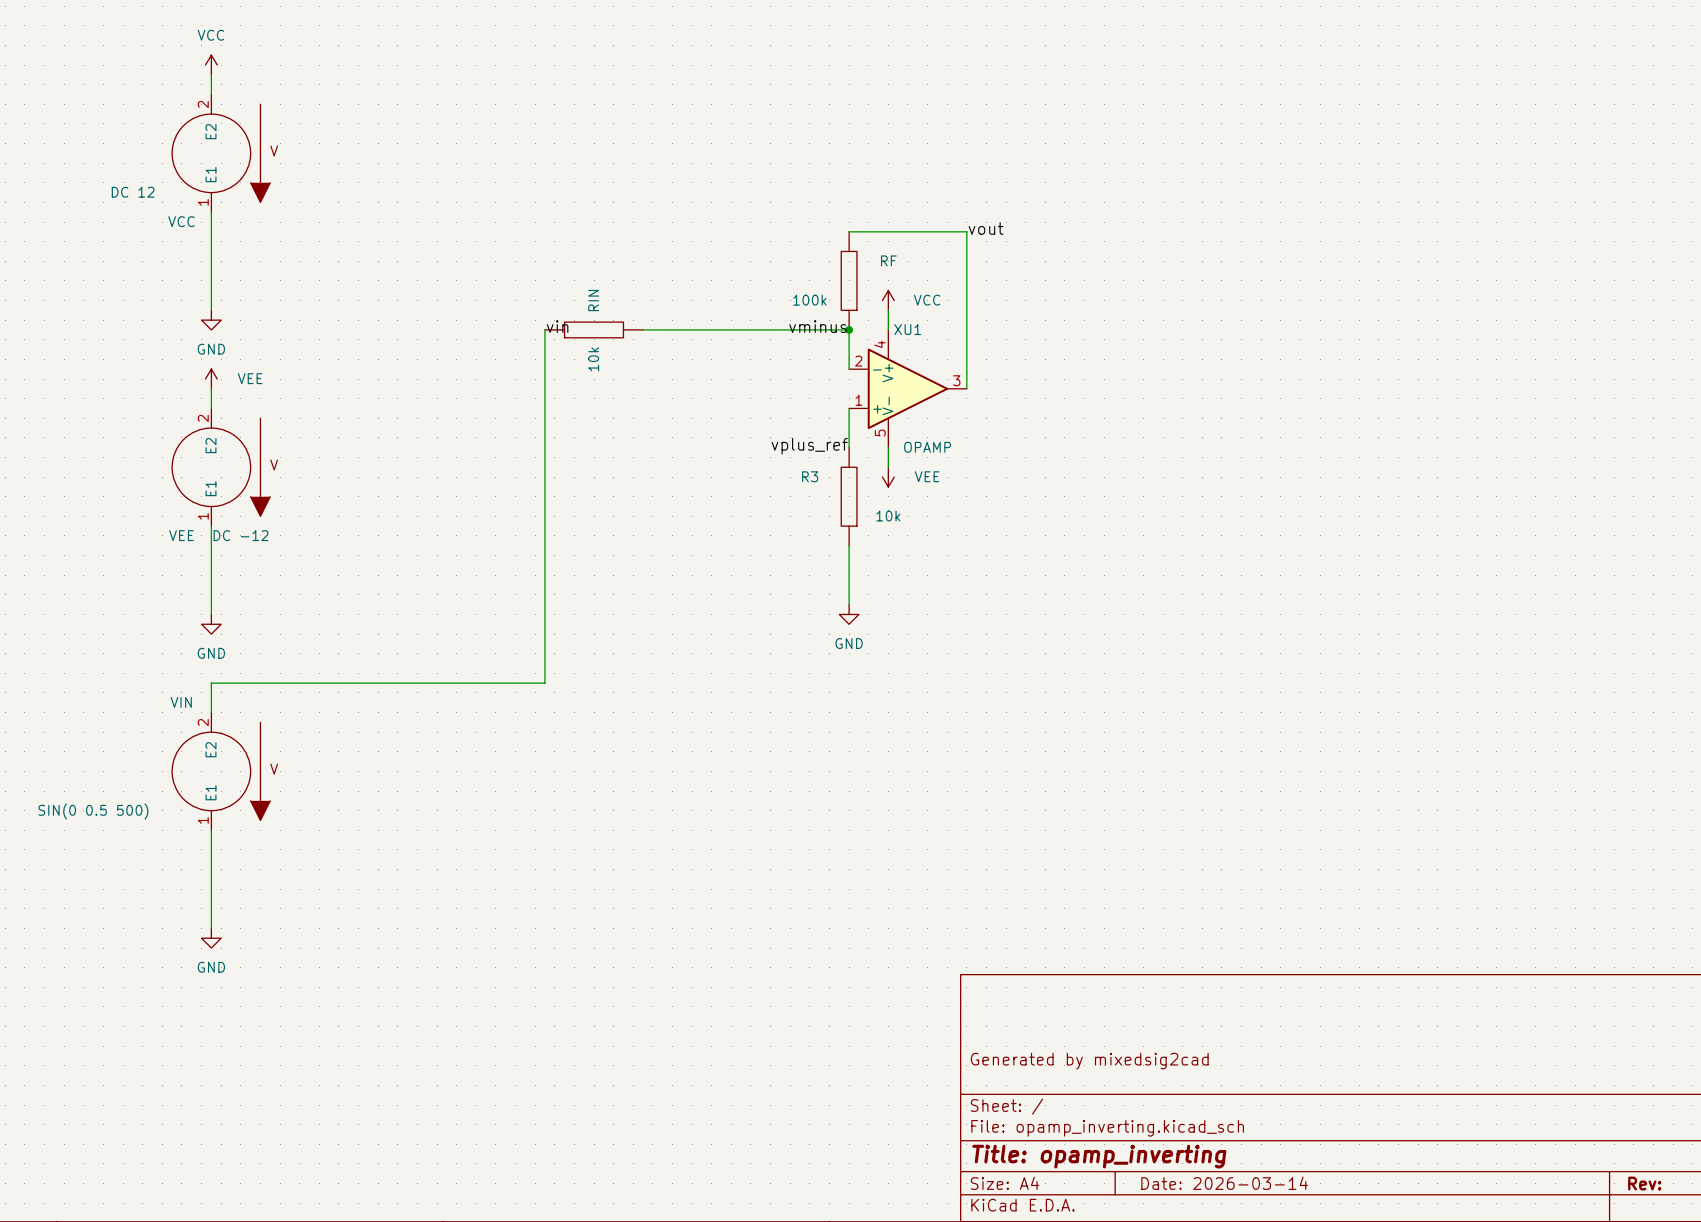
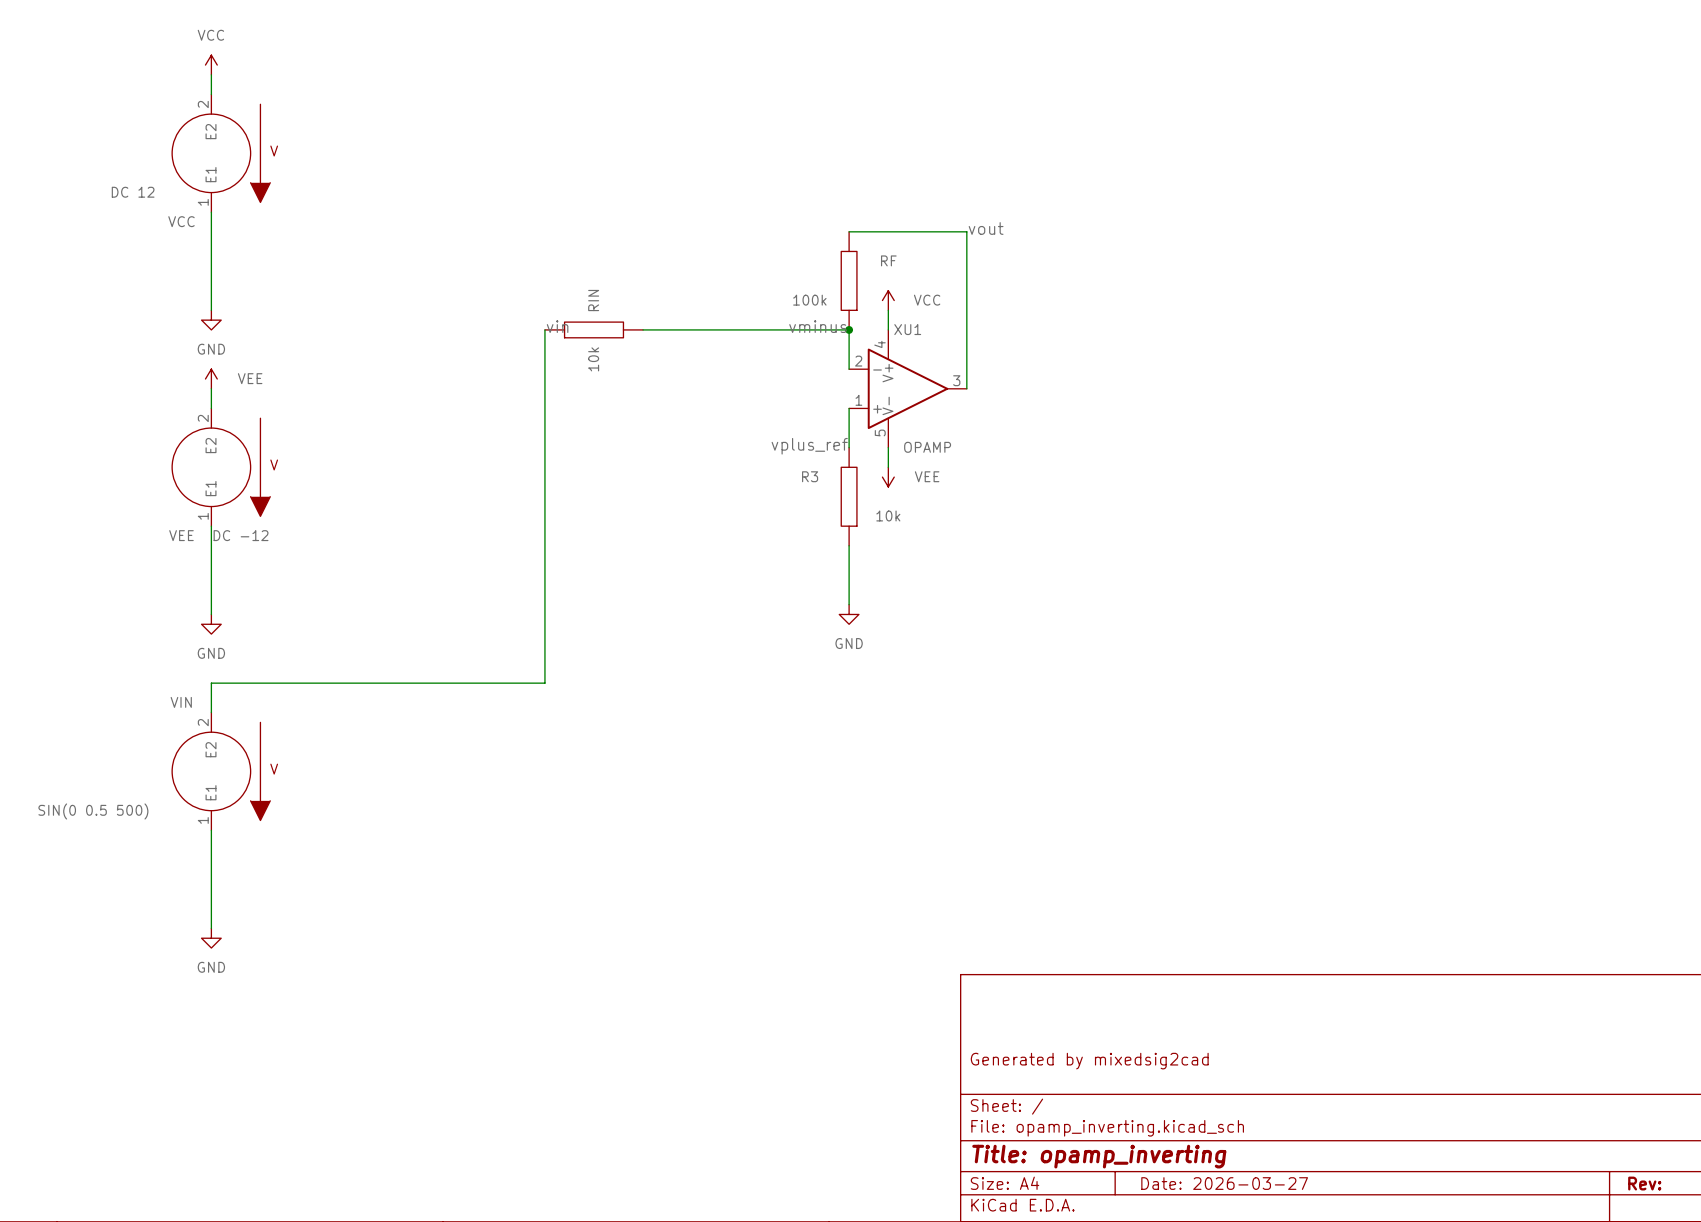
title block: Date: 2026-03-14 (1224, 1183) -> Date: 2026-03-27 (1224, 1183)

